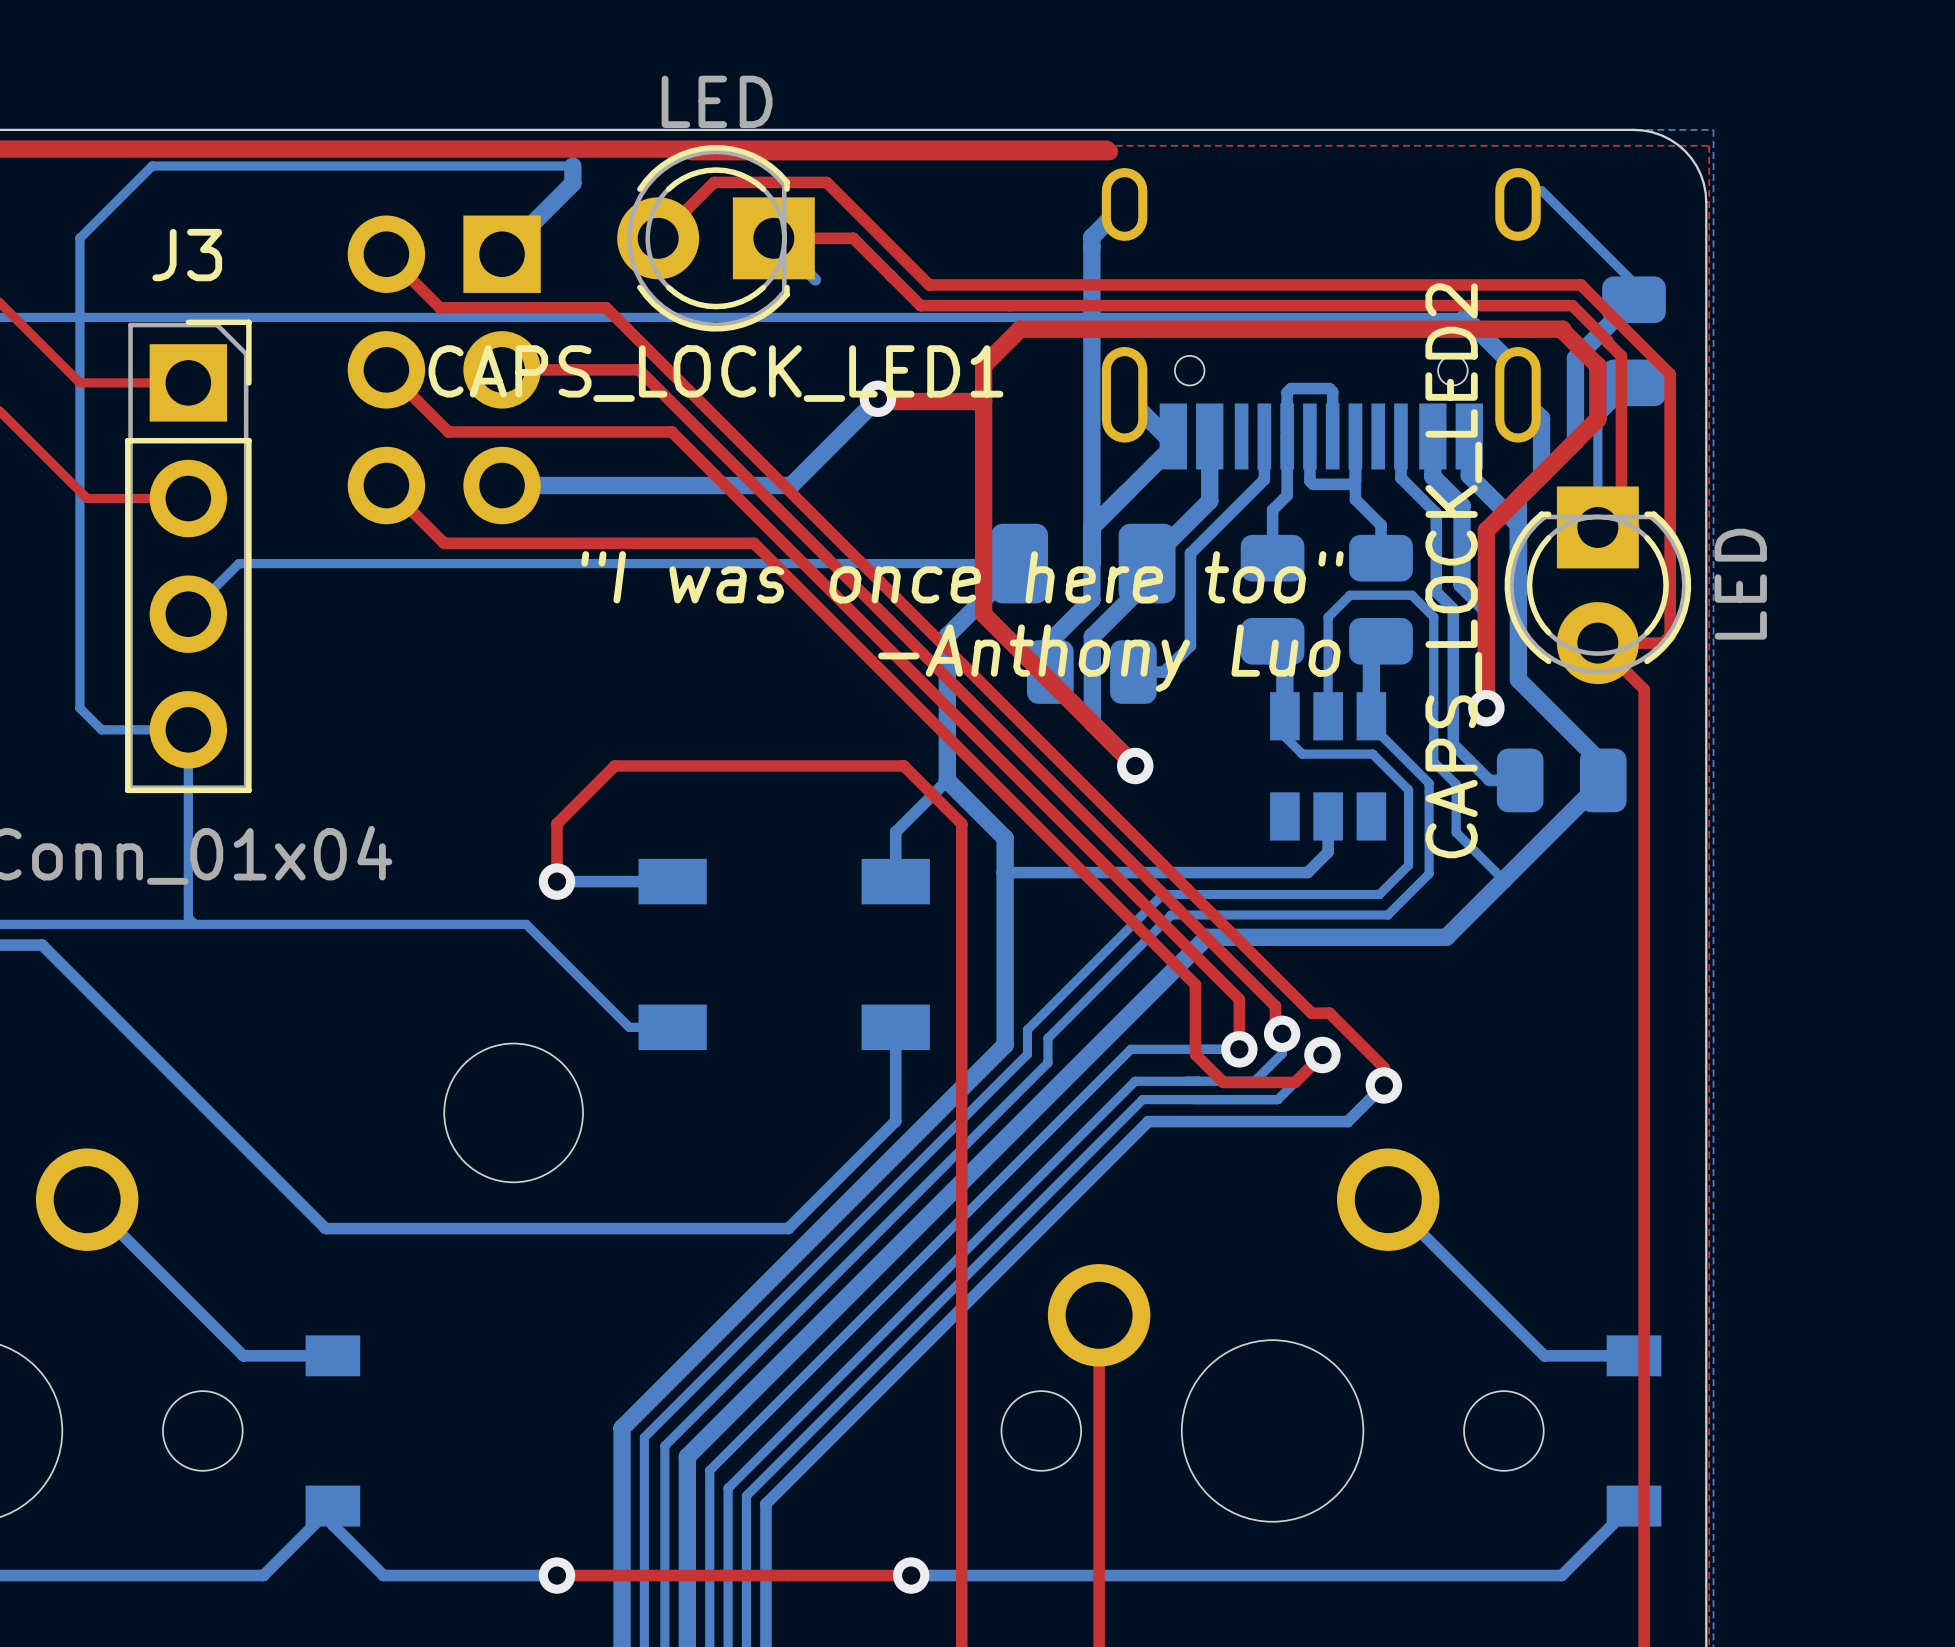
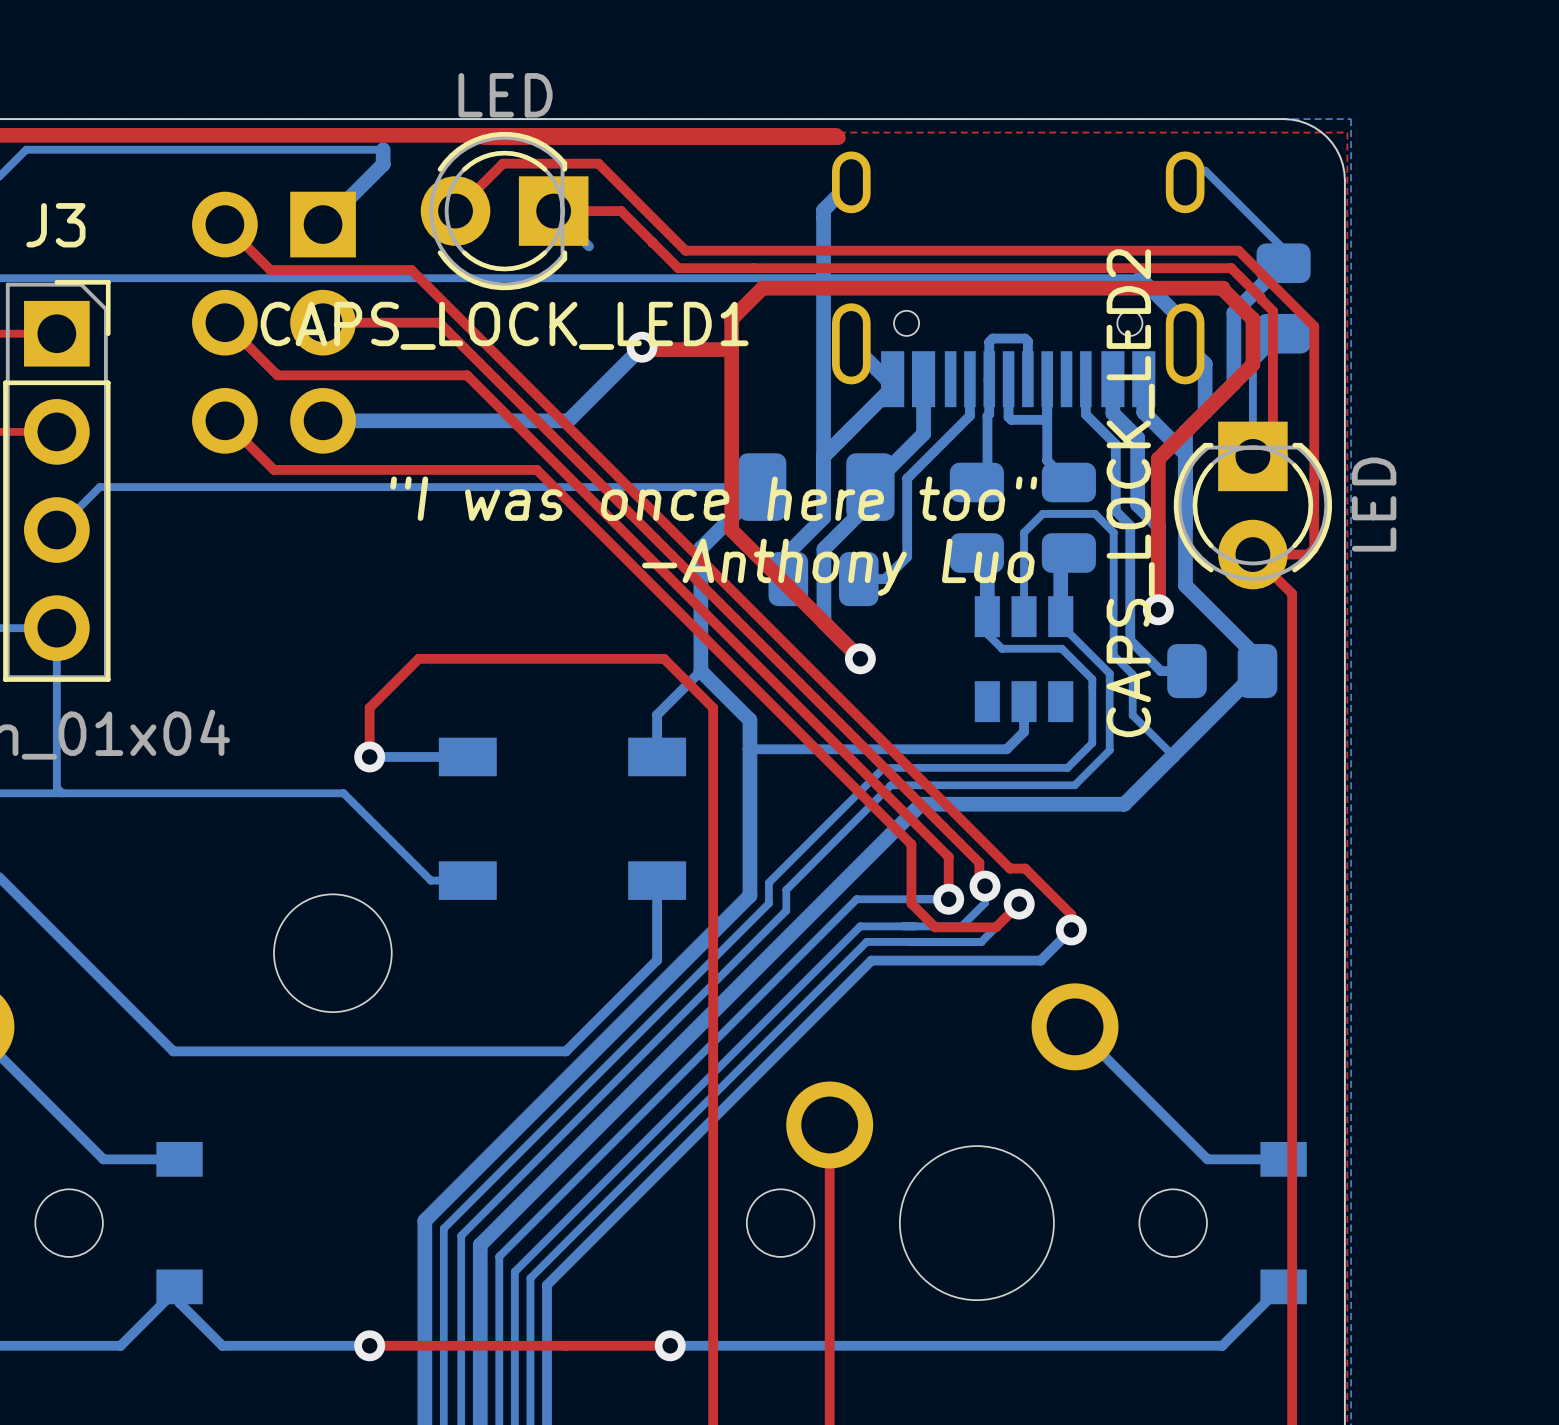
bottom track: (1287, 477) (1287, 495) (1272, 510) (1272, 558) -> (989, 414) (987, 415) (987, 471)
bottom track: (1355, 499) (1381, 525) (1381, 558) -> (1047, 432) (1047, 460) (1068, 482)

